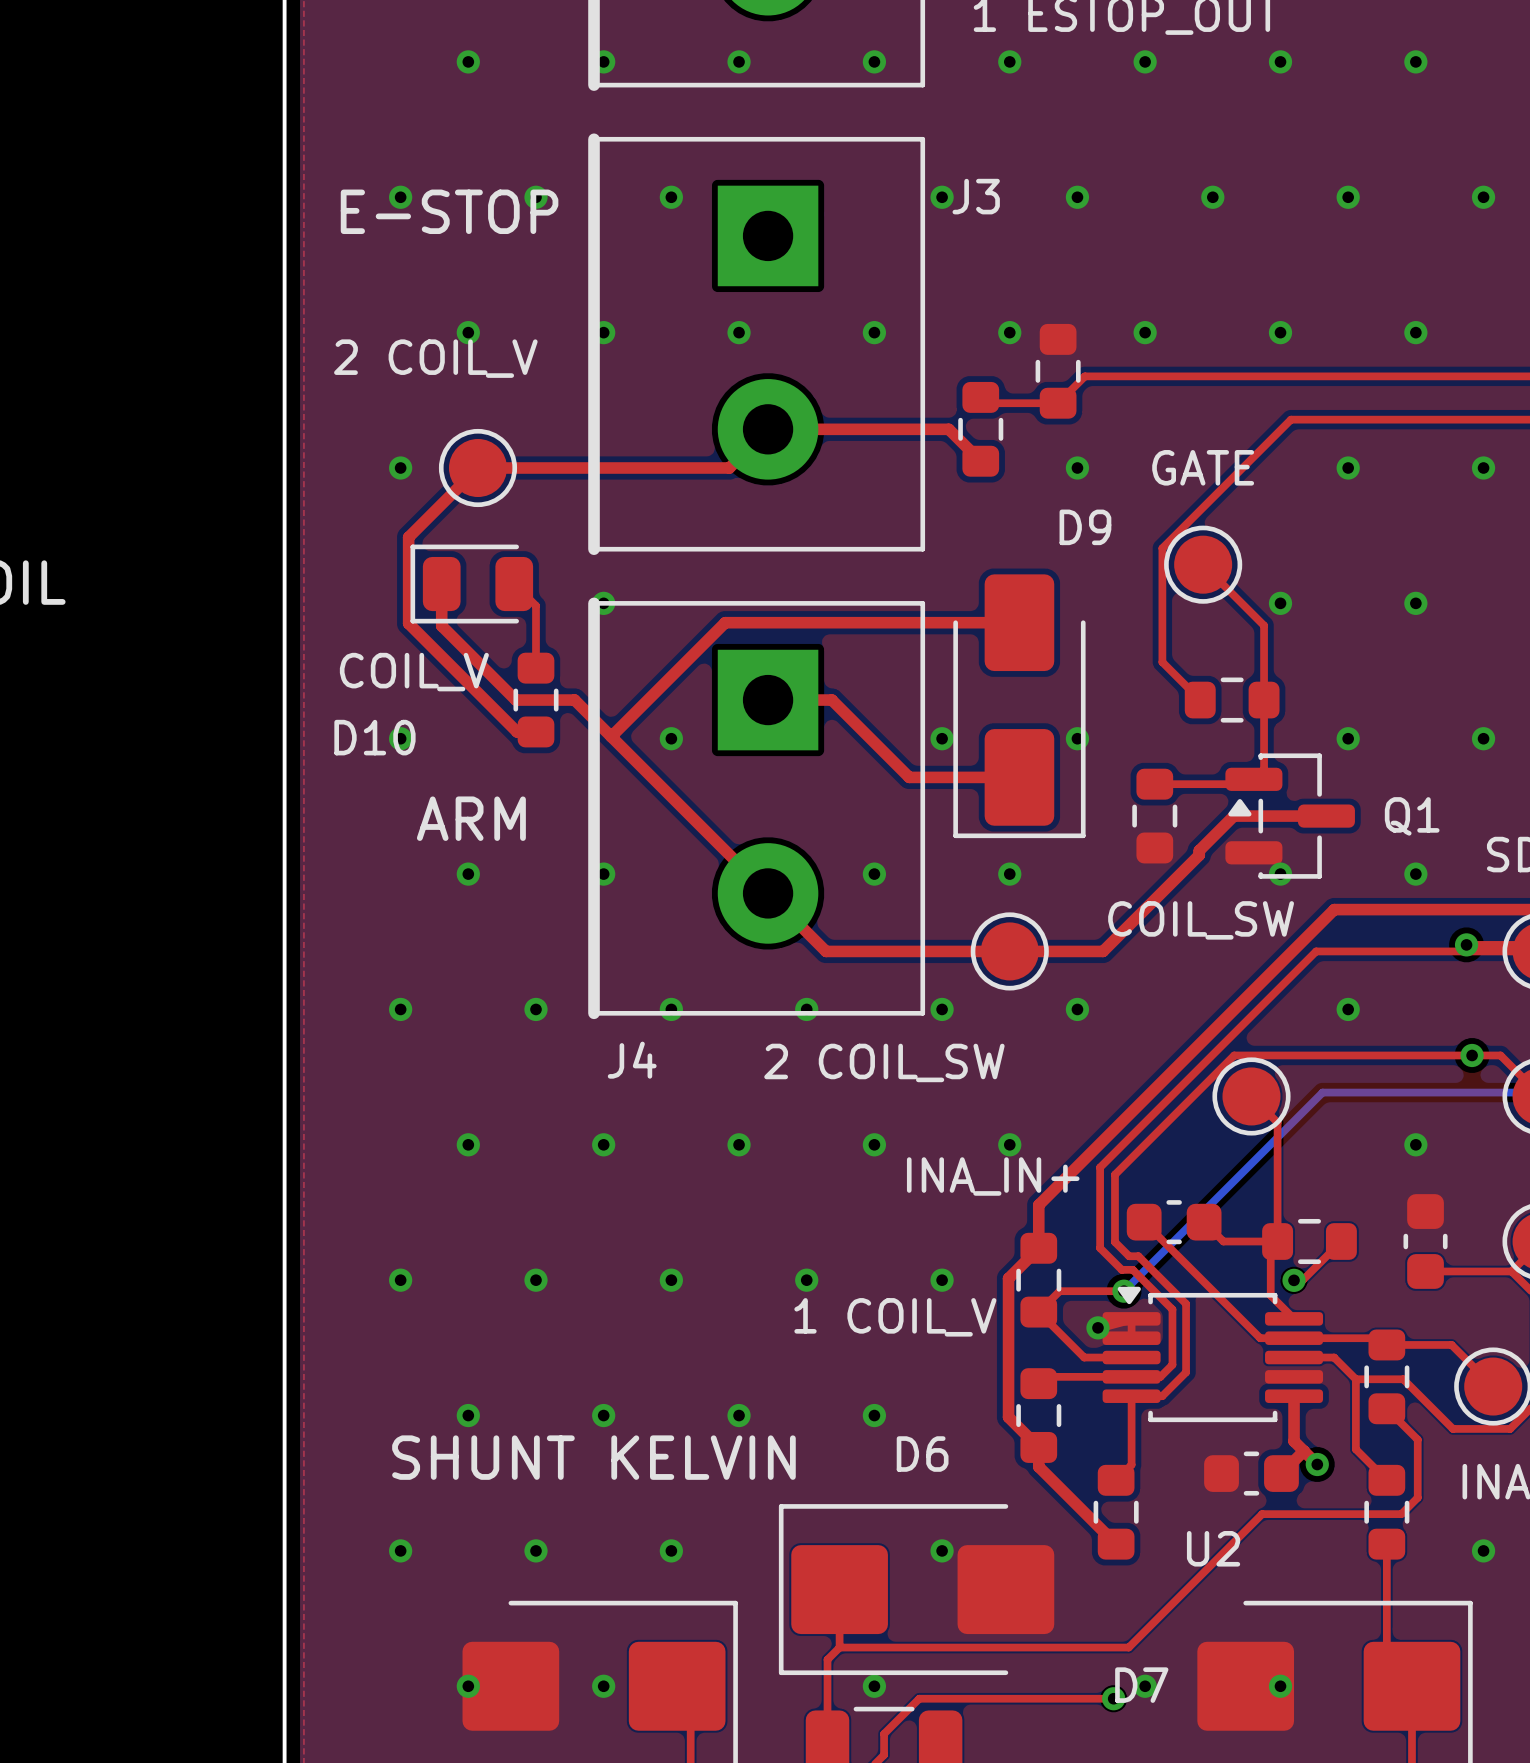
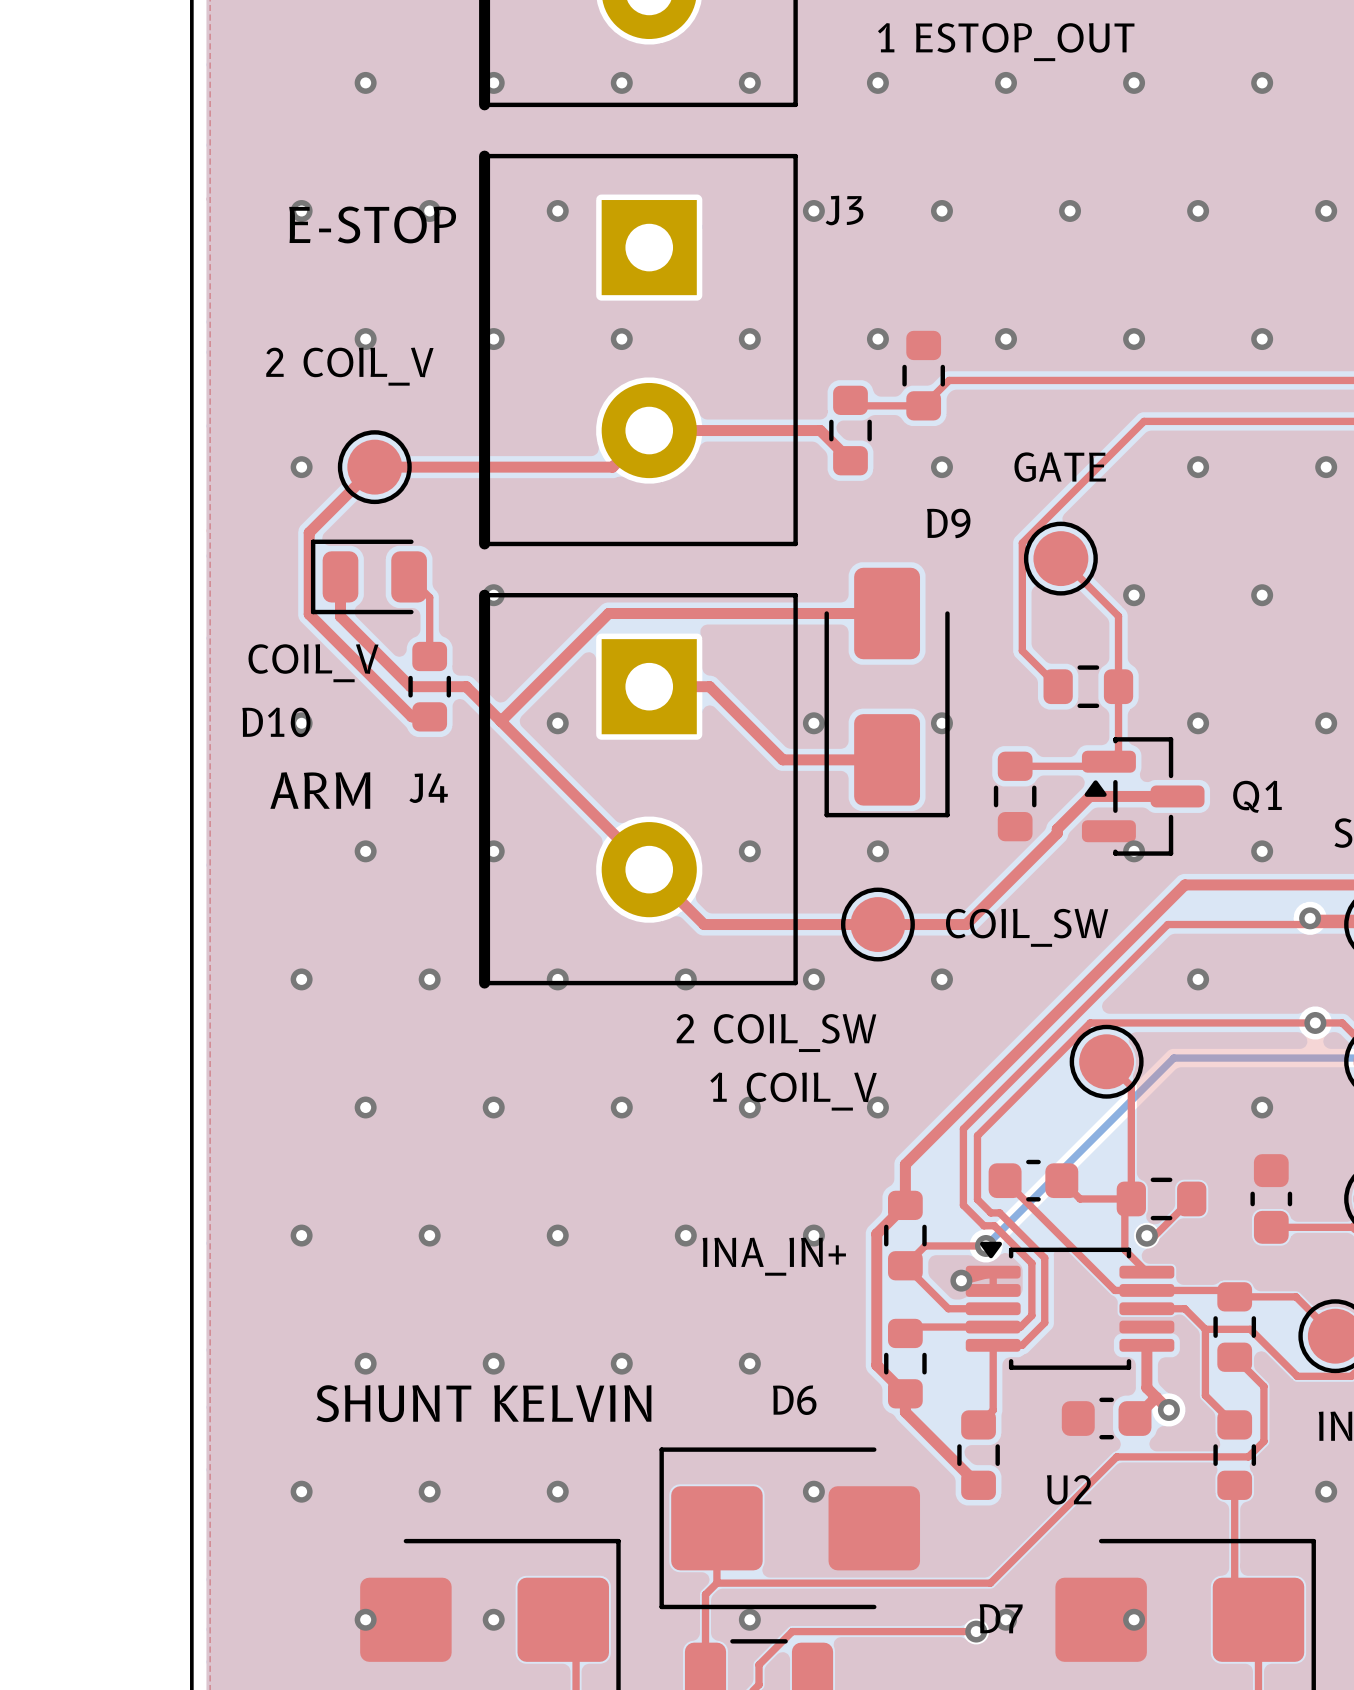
text position: ARM (471, 818) -> ARM (320, 790)
text position: COIL_SW (1201, 920) -> COIL_SW (1027, 927)
J4 name position: J4 (632, 1060) -> J4 (428, 788)
text position: INA_IN+ (993, 1176) -> INA_IN+ (774, 1256)
text position: 1 COIL_V (895, 1317) -> 1 COIL_V (793, 1091)

